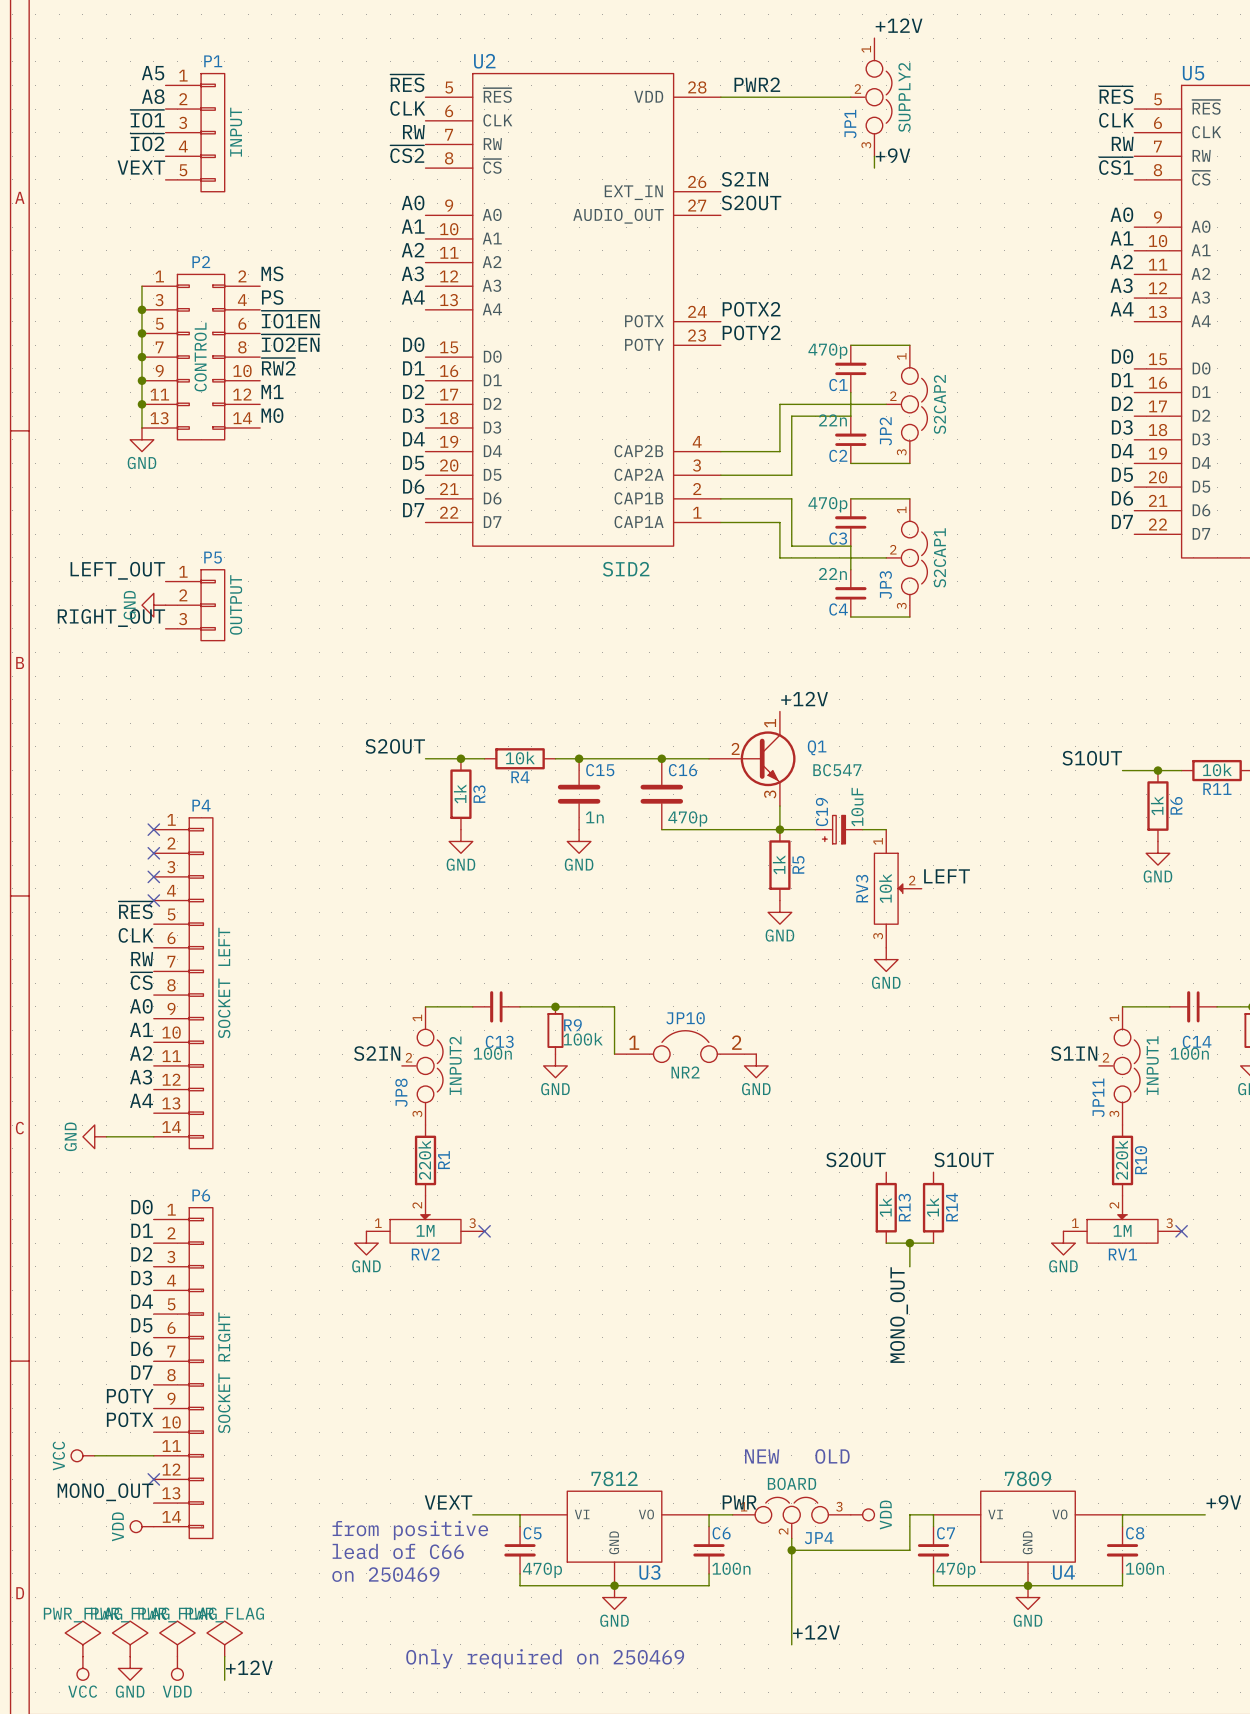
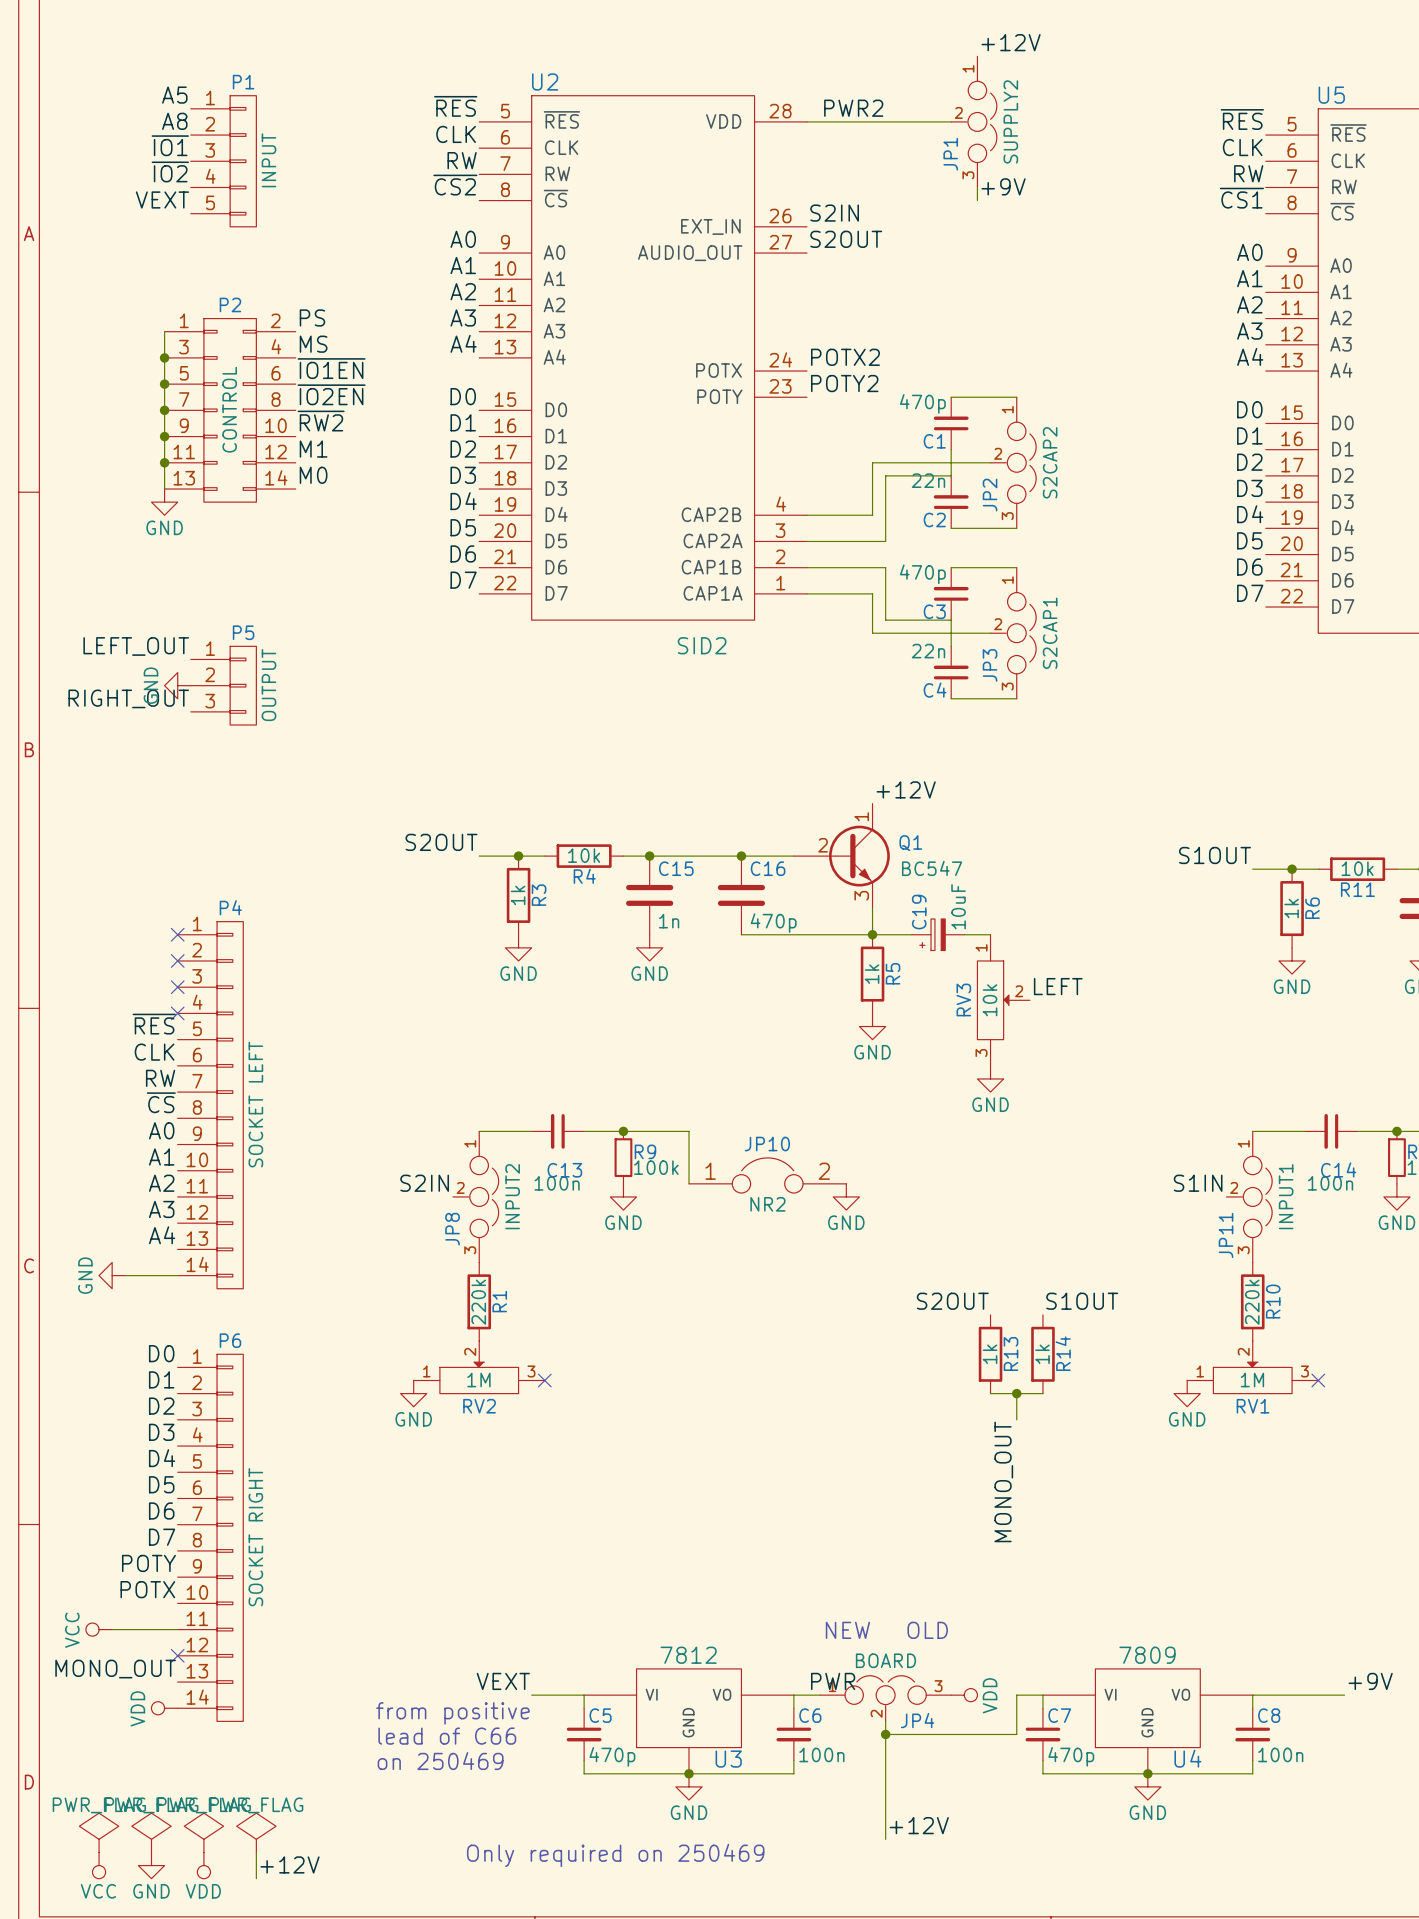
label: MS (272, 273) -> PS (312, 317)
label: PS (272, 297) -> MS (313, 344)

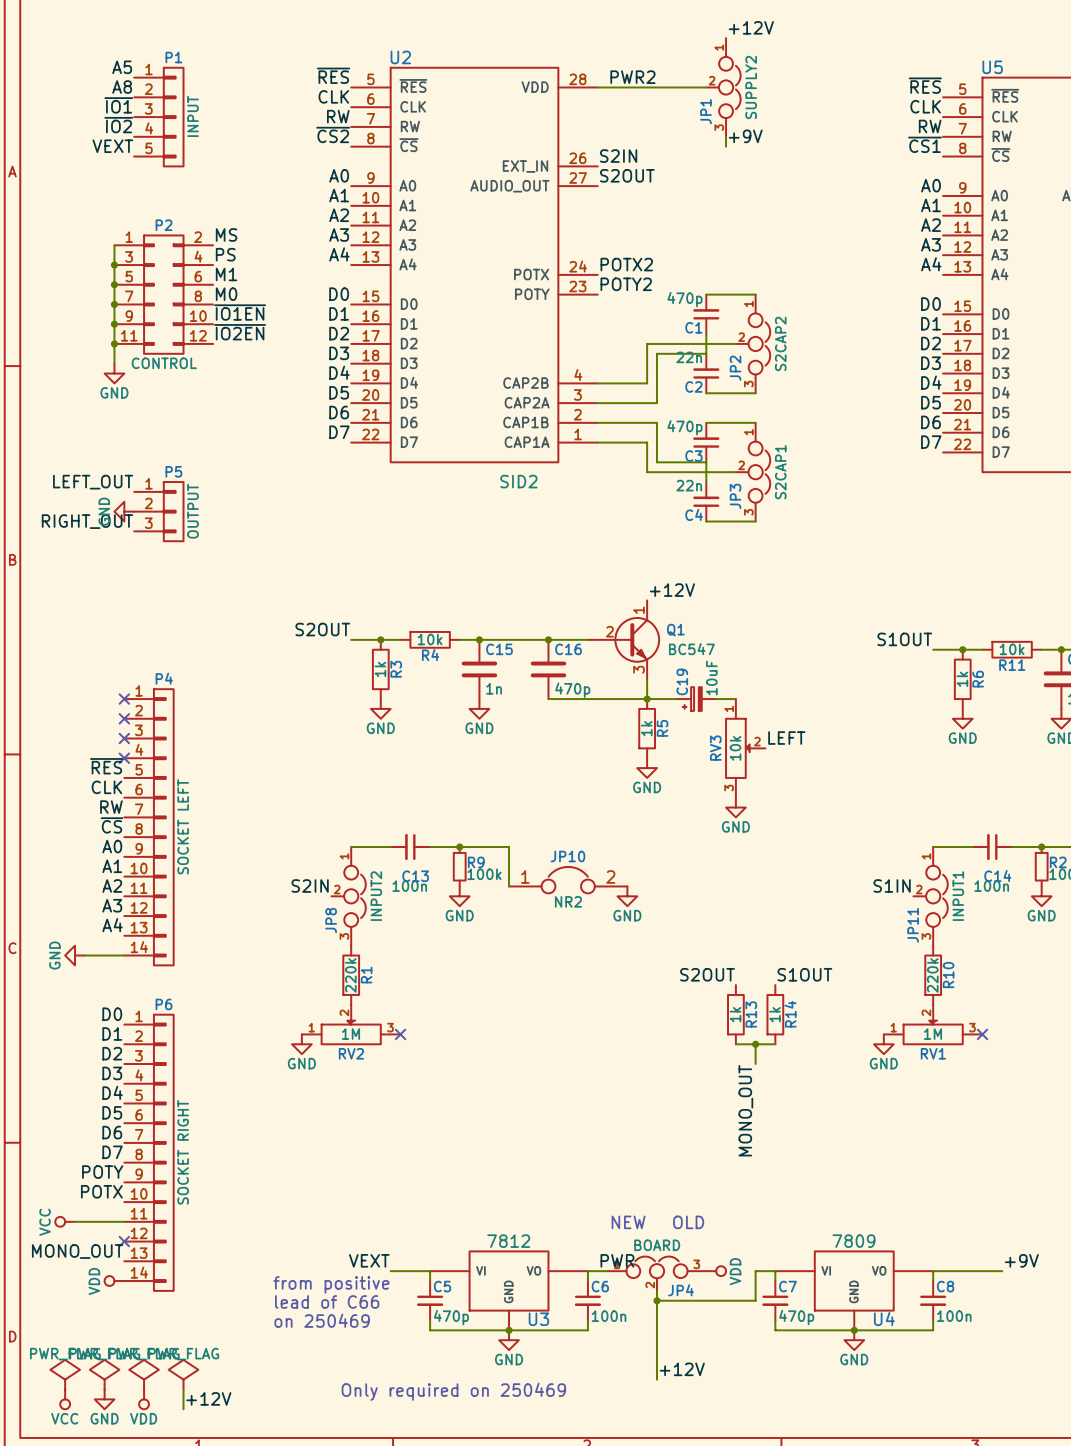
label: PS (312, 317) -> MS (226, 234)
P2 symbol: [164, 318, 296, 503] -> [114, 235, 214, 354]
label: MS (313, 344) -> PS (225, 254)
label: ~{IO1EN} (331, 368) -> M1 (226, 274)
label: ~{IO2EN} (331, 394) -> M0 (226, 294)
P2 value position: CONTROL (229, 409) -> CONTROL (164, 363)
label: ~{RW2} (321, 421) -> ~{IO1EN} (240, 312)
label: M1 (313, 449) -> ~{IO2EN} (240, 332)
label: M0 (313, 475) -> none

